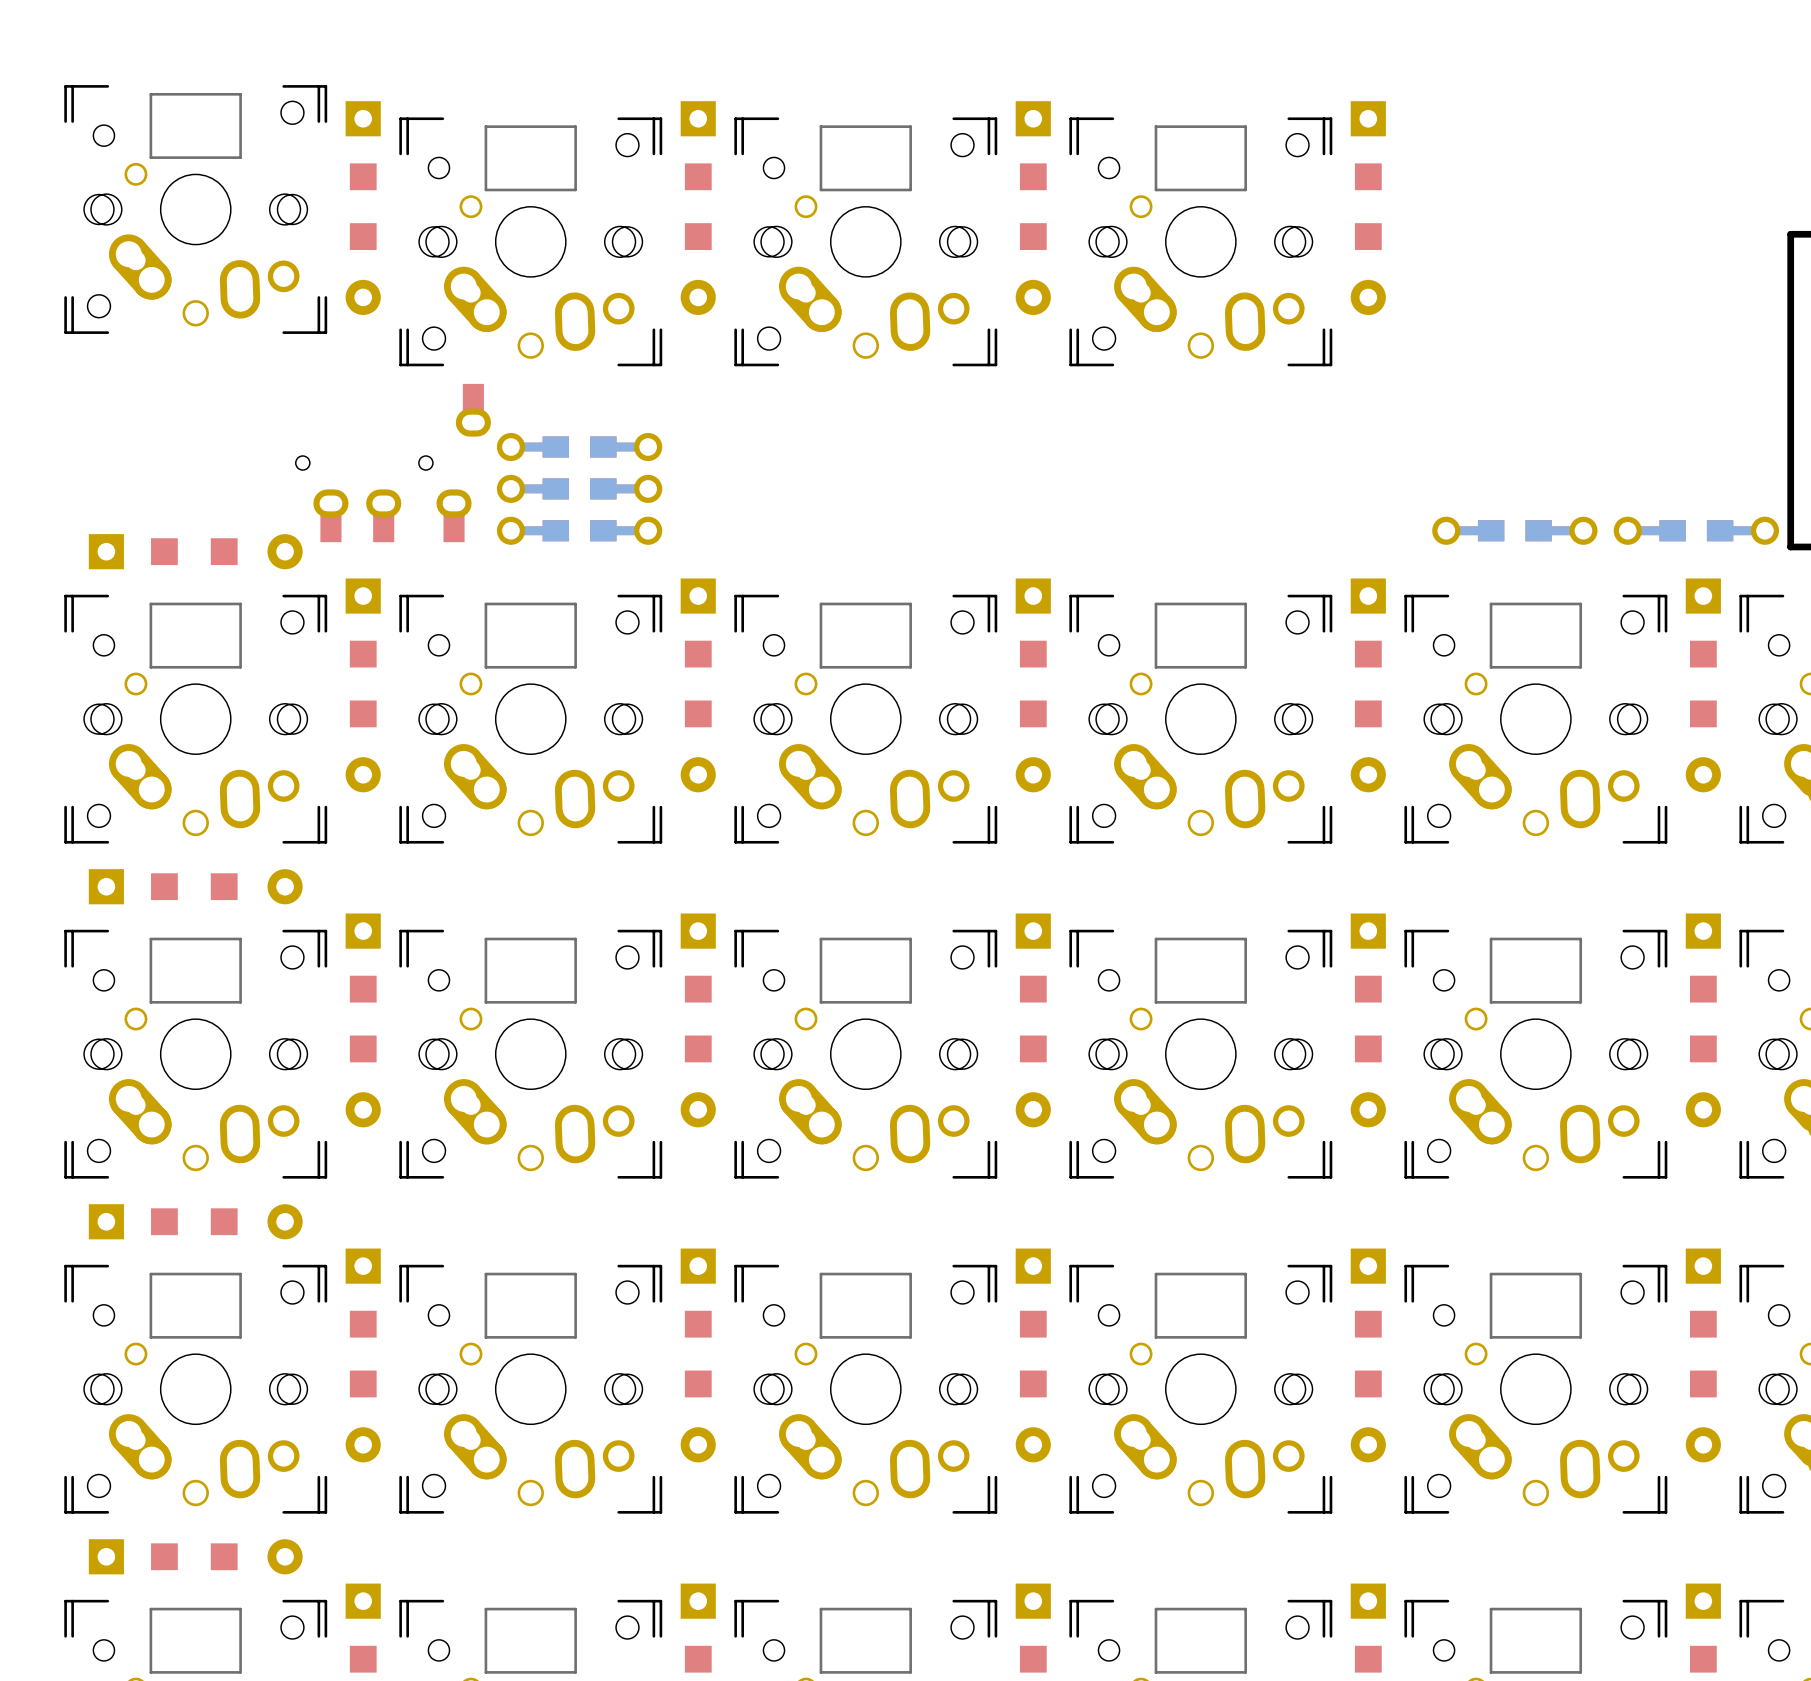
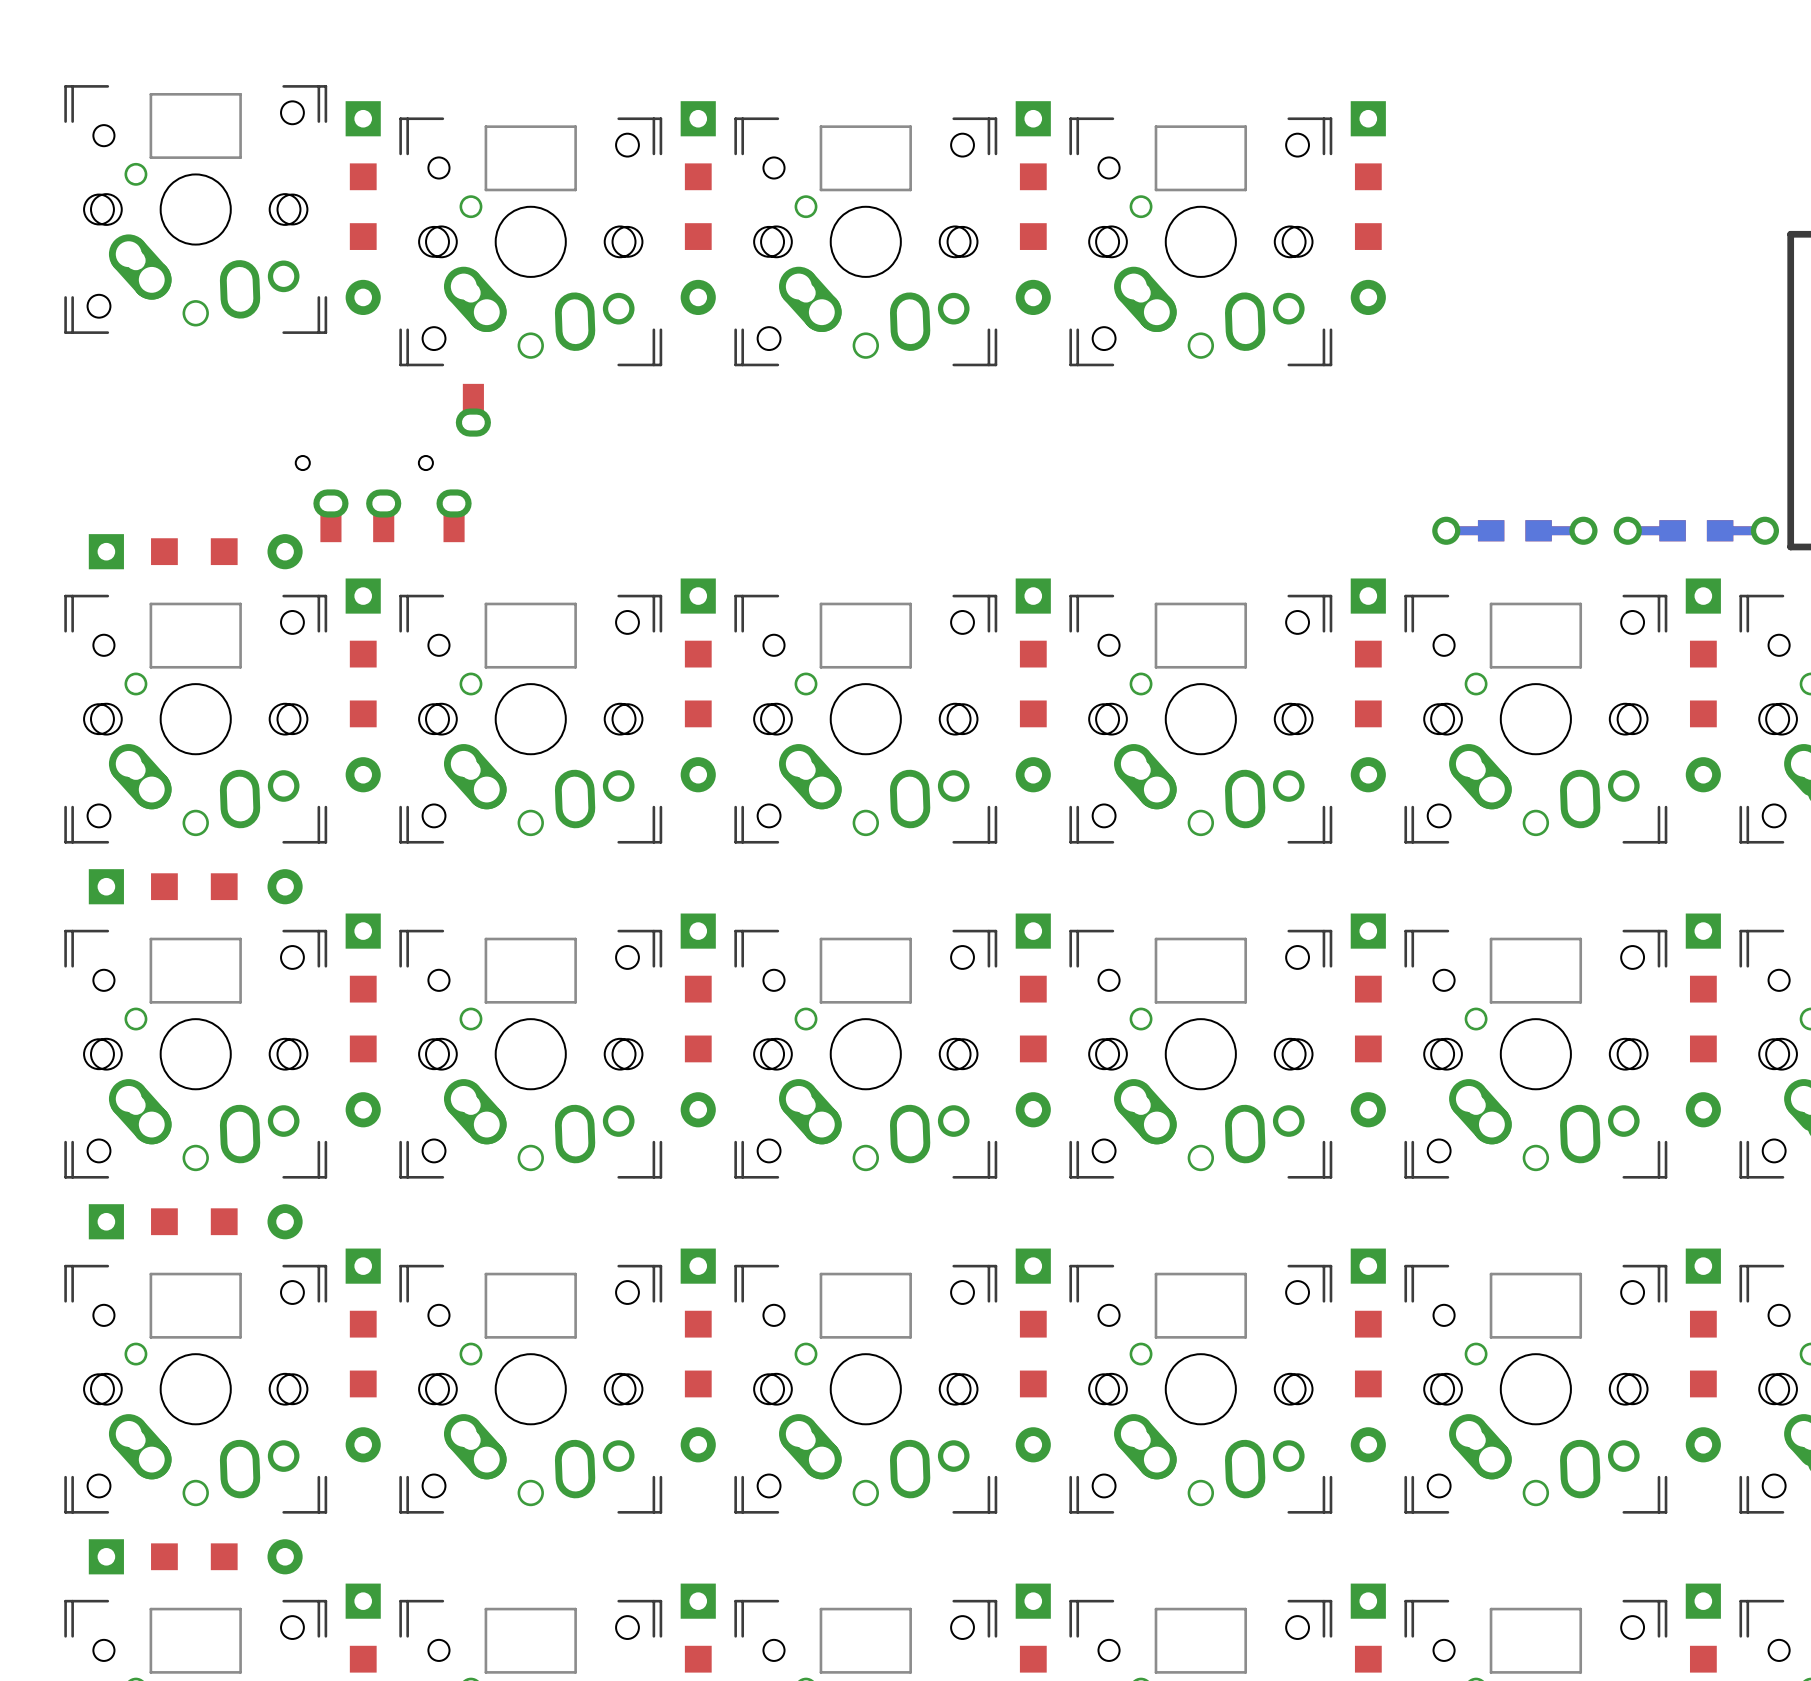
part: (579, 447) -> none
part: (579, 488) -> none
part: (579, 530) -> none

